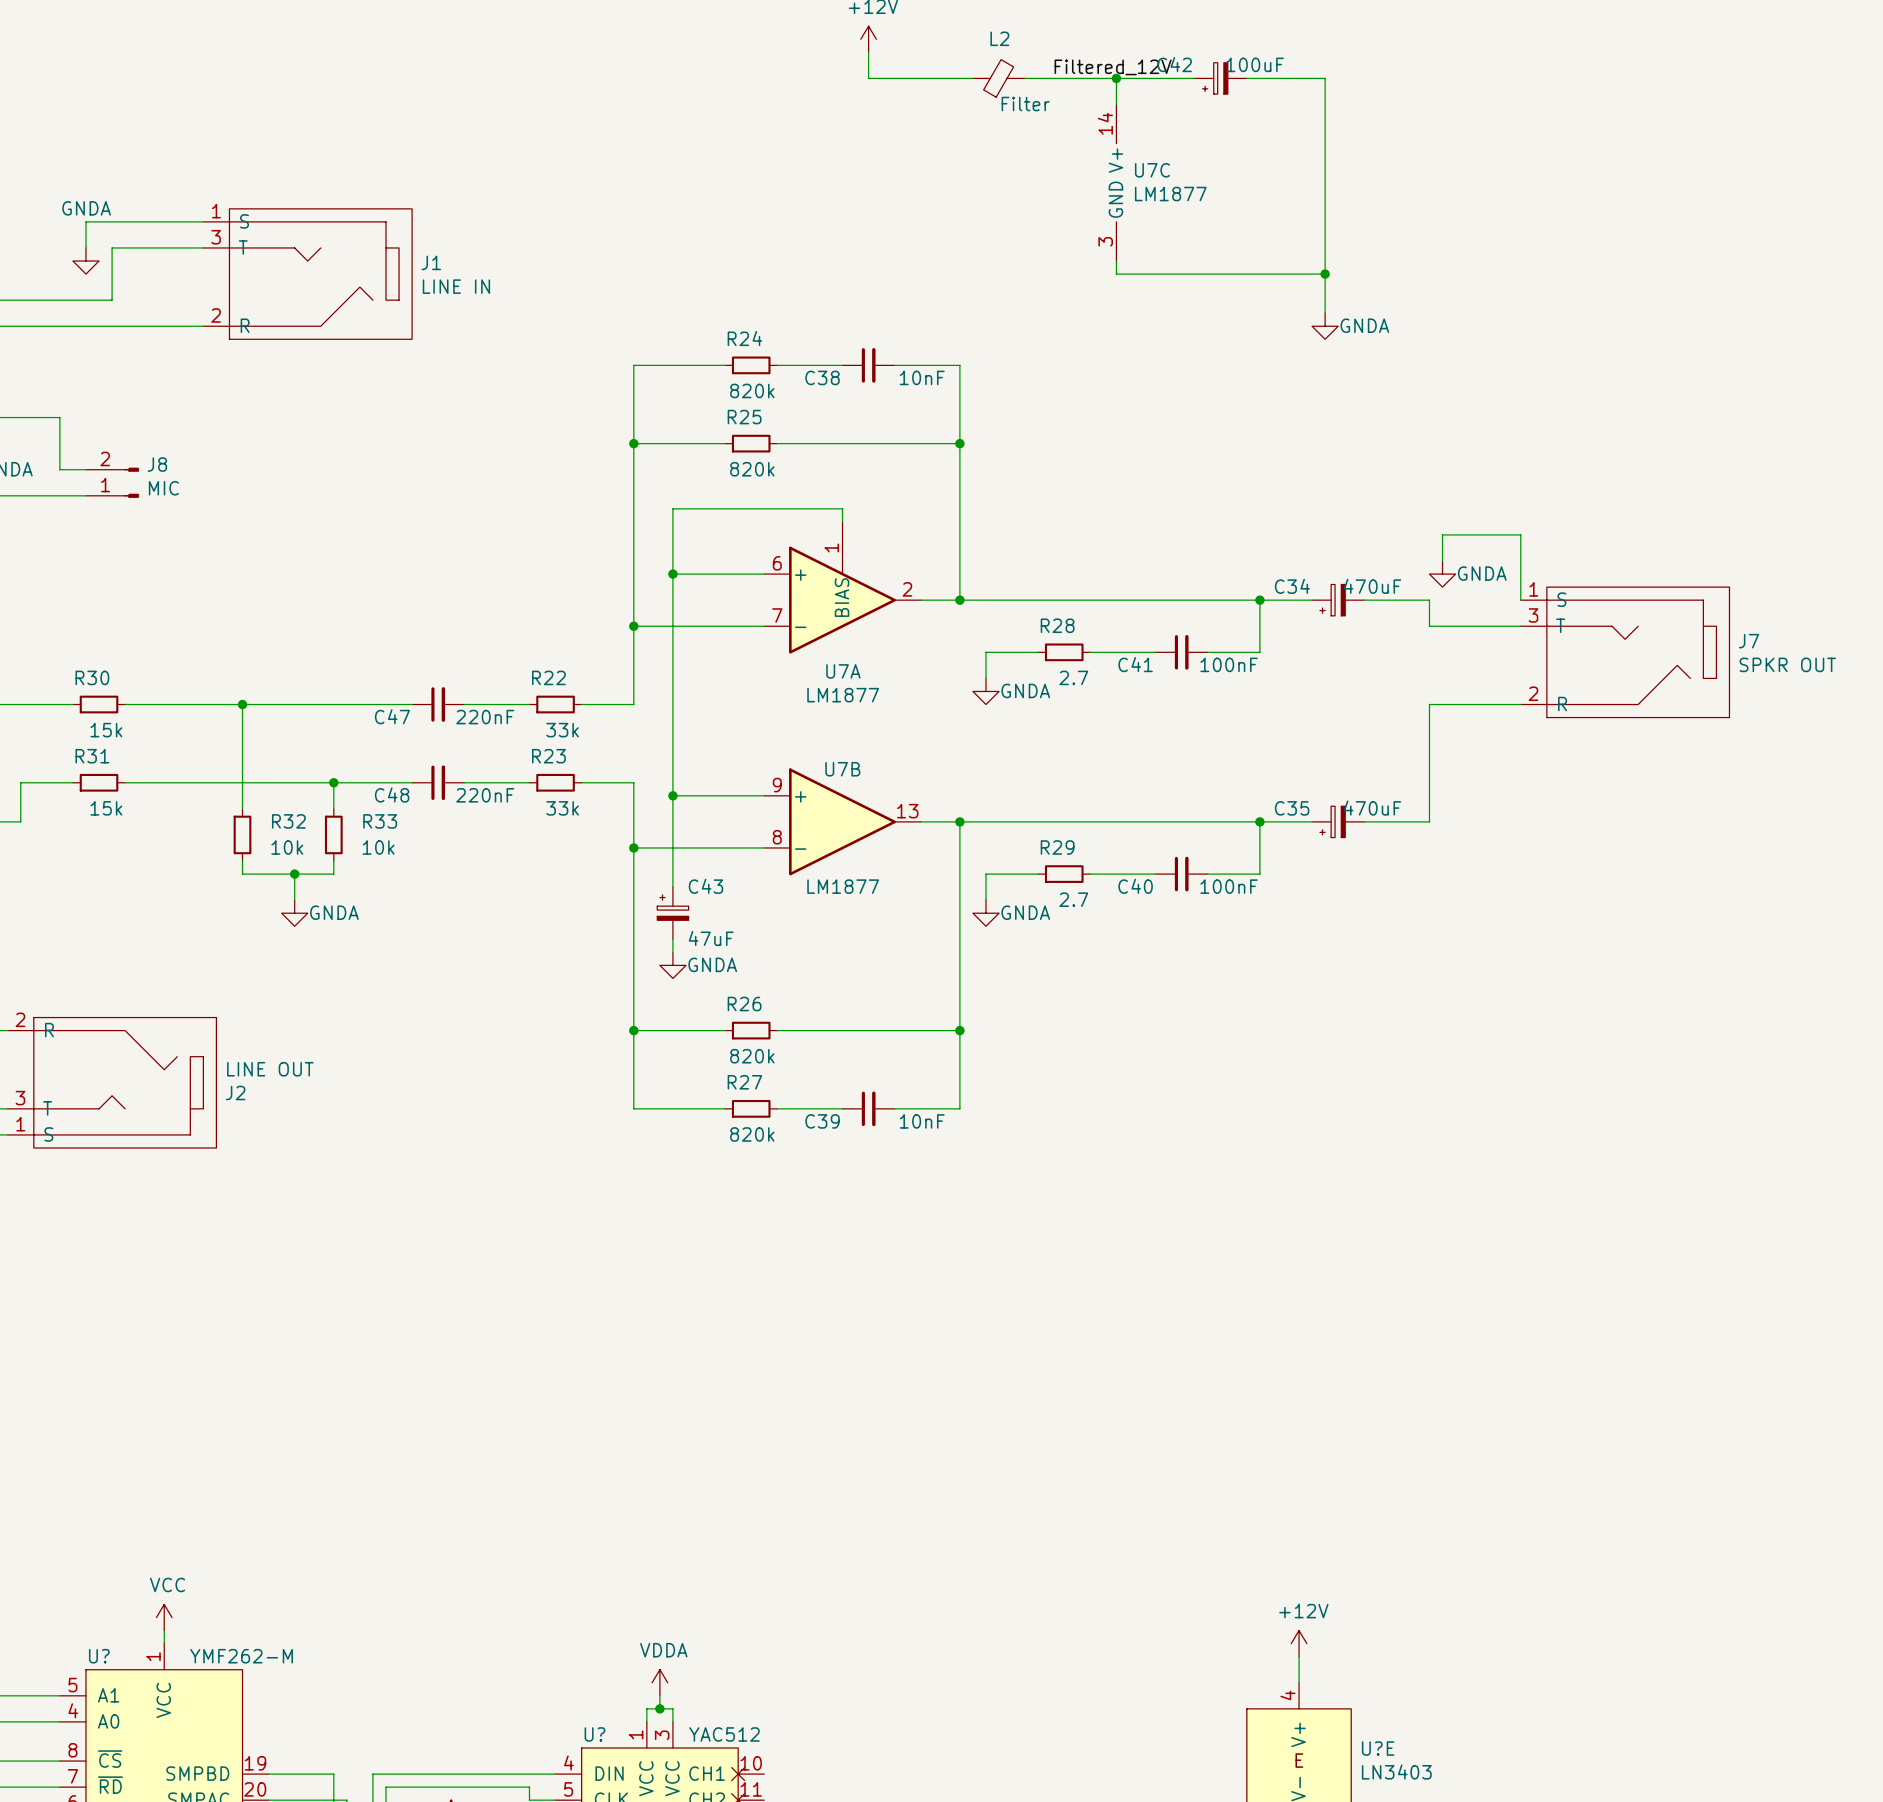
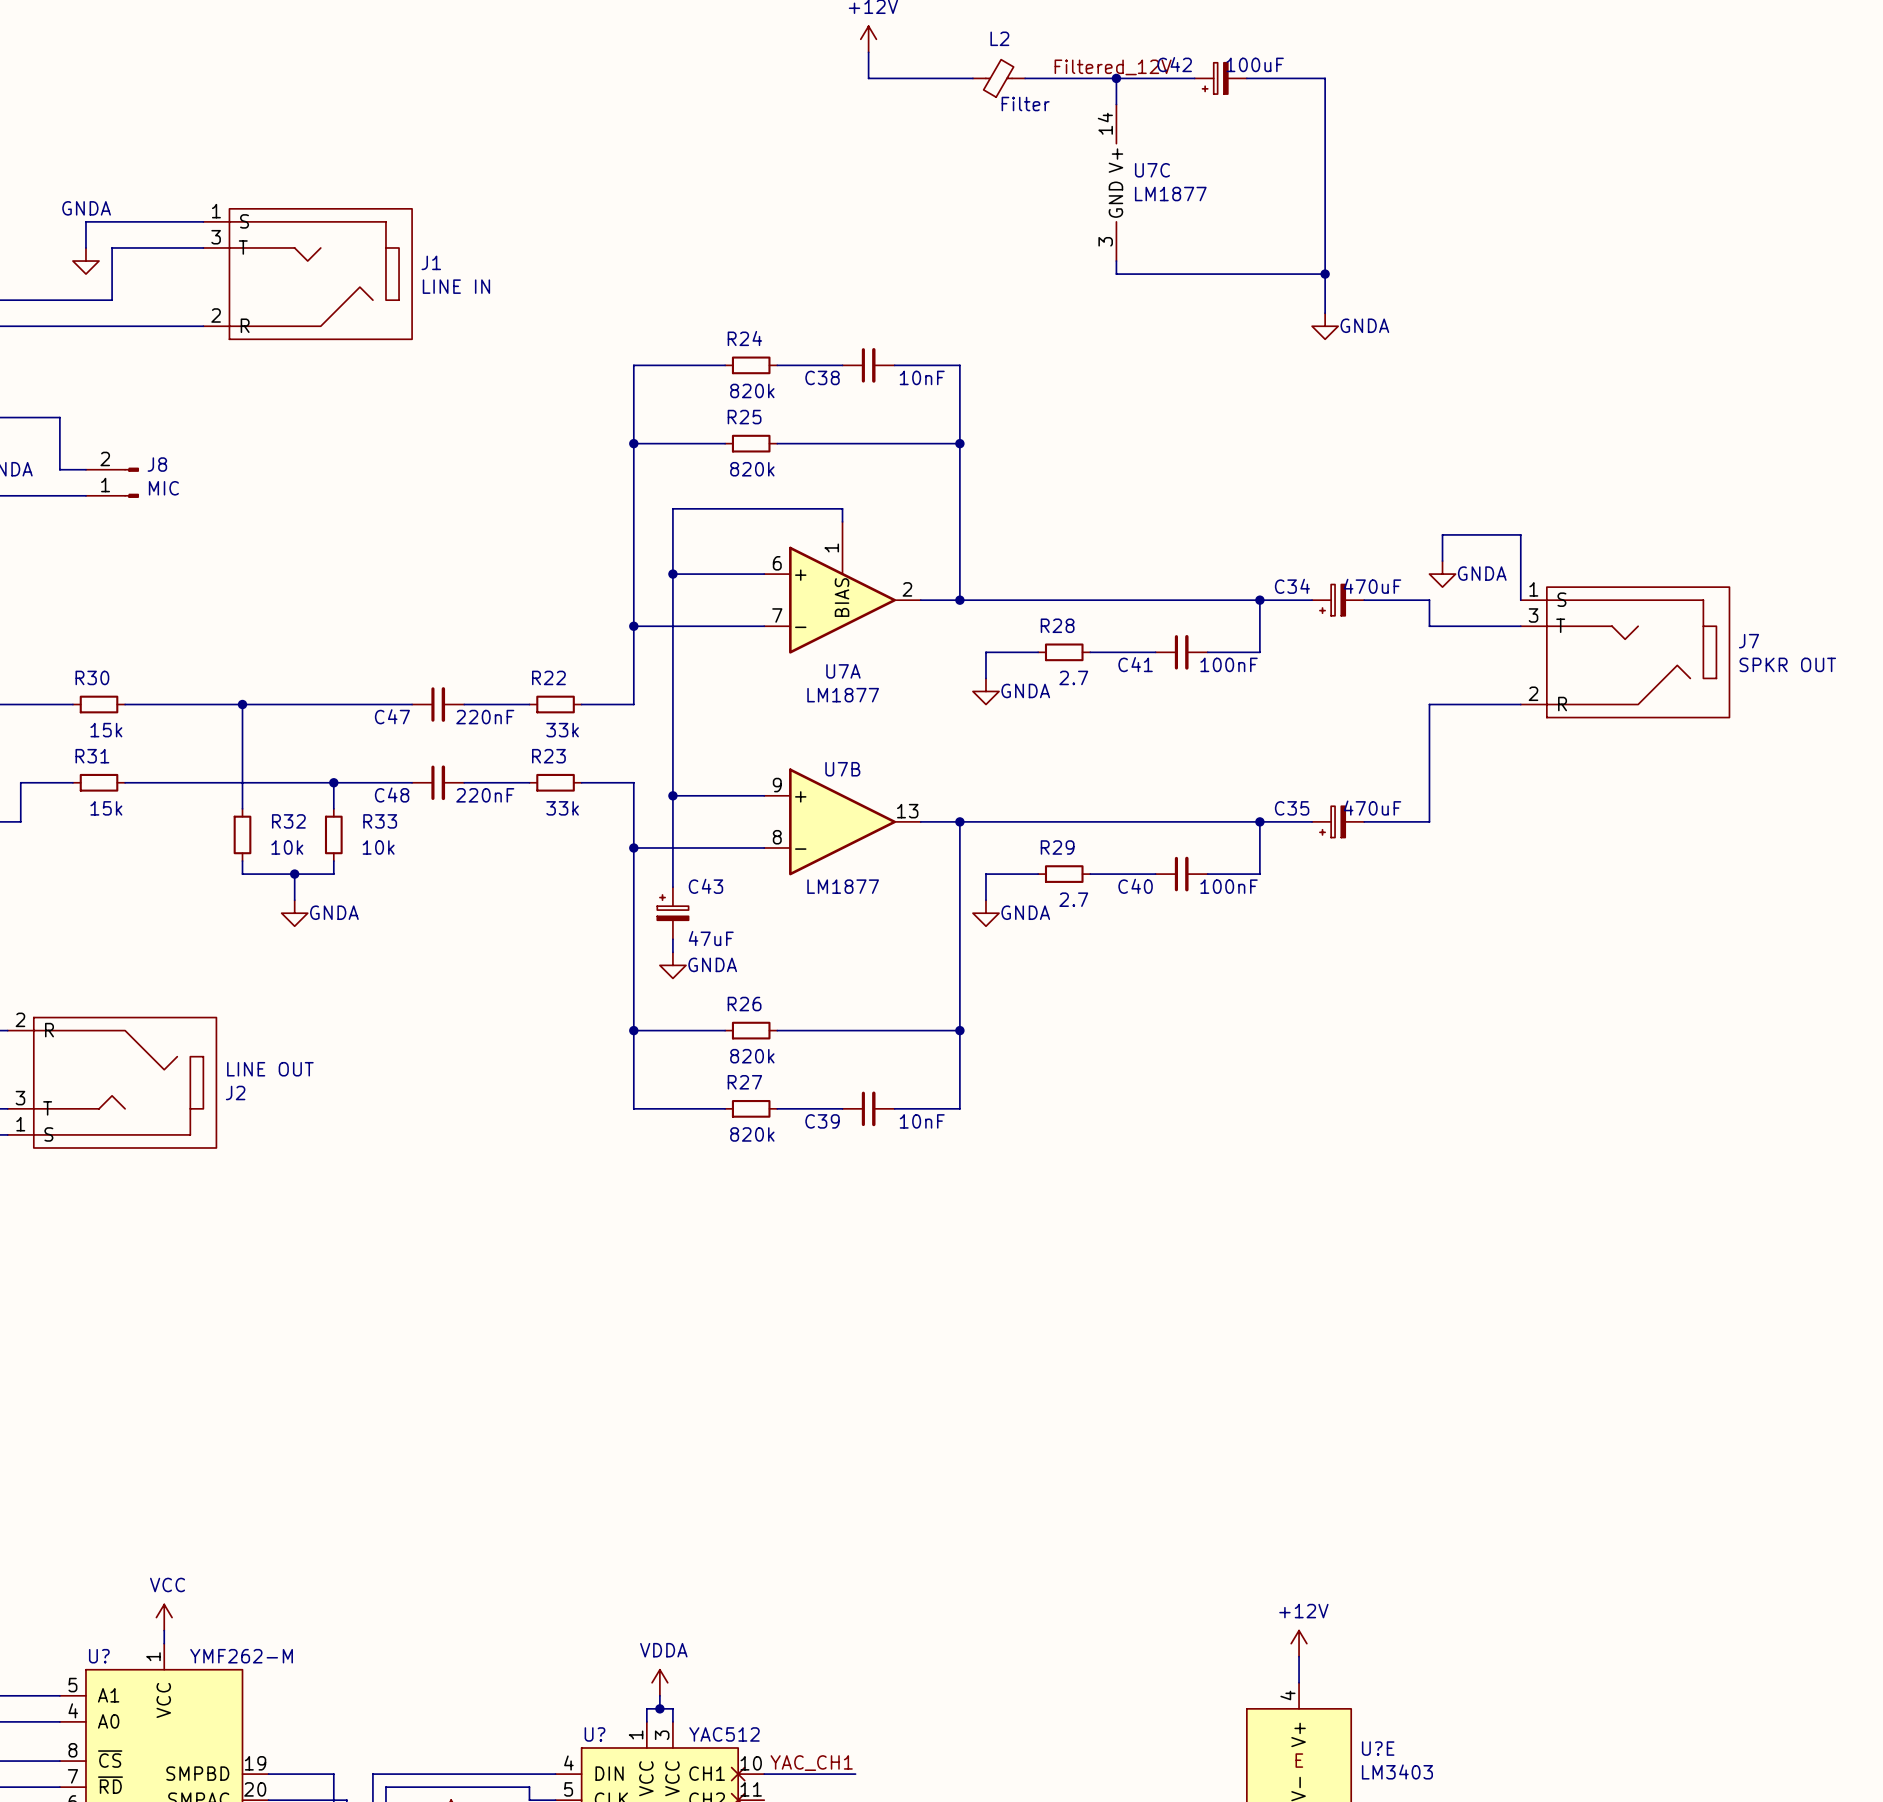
label: none -> YAC_CH1 (811, 1763)
U?E value: LN3403 (1396, 1771) -> LM3403 (1397, 1771)
wire: none -> (764, 1774) (855, 1774)

